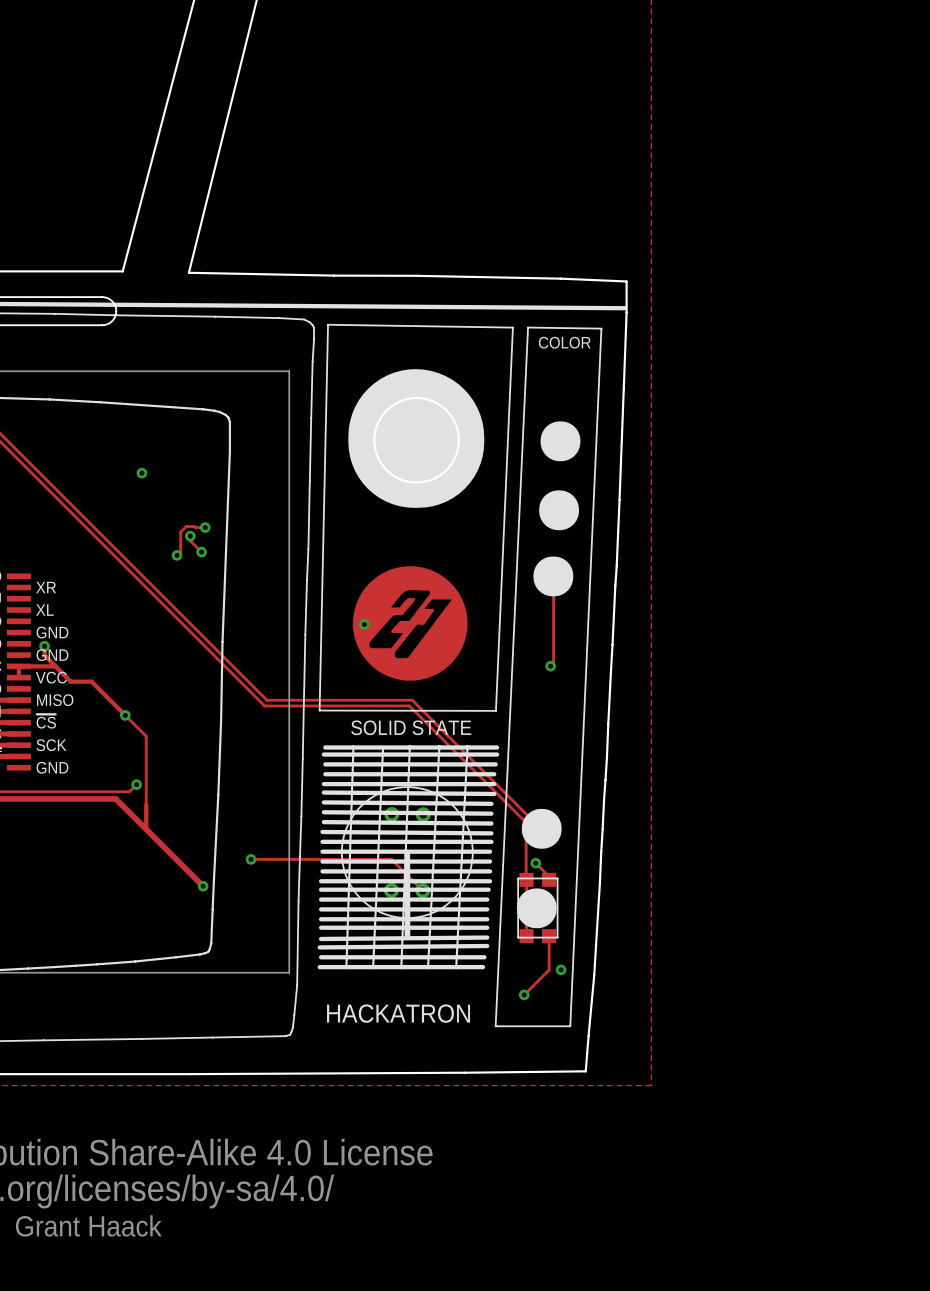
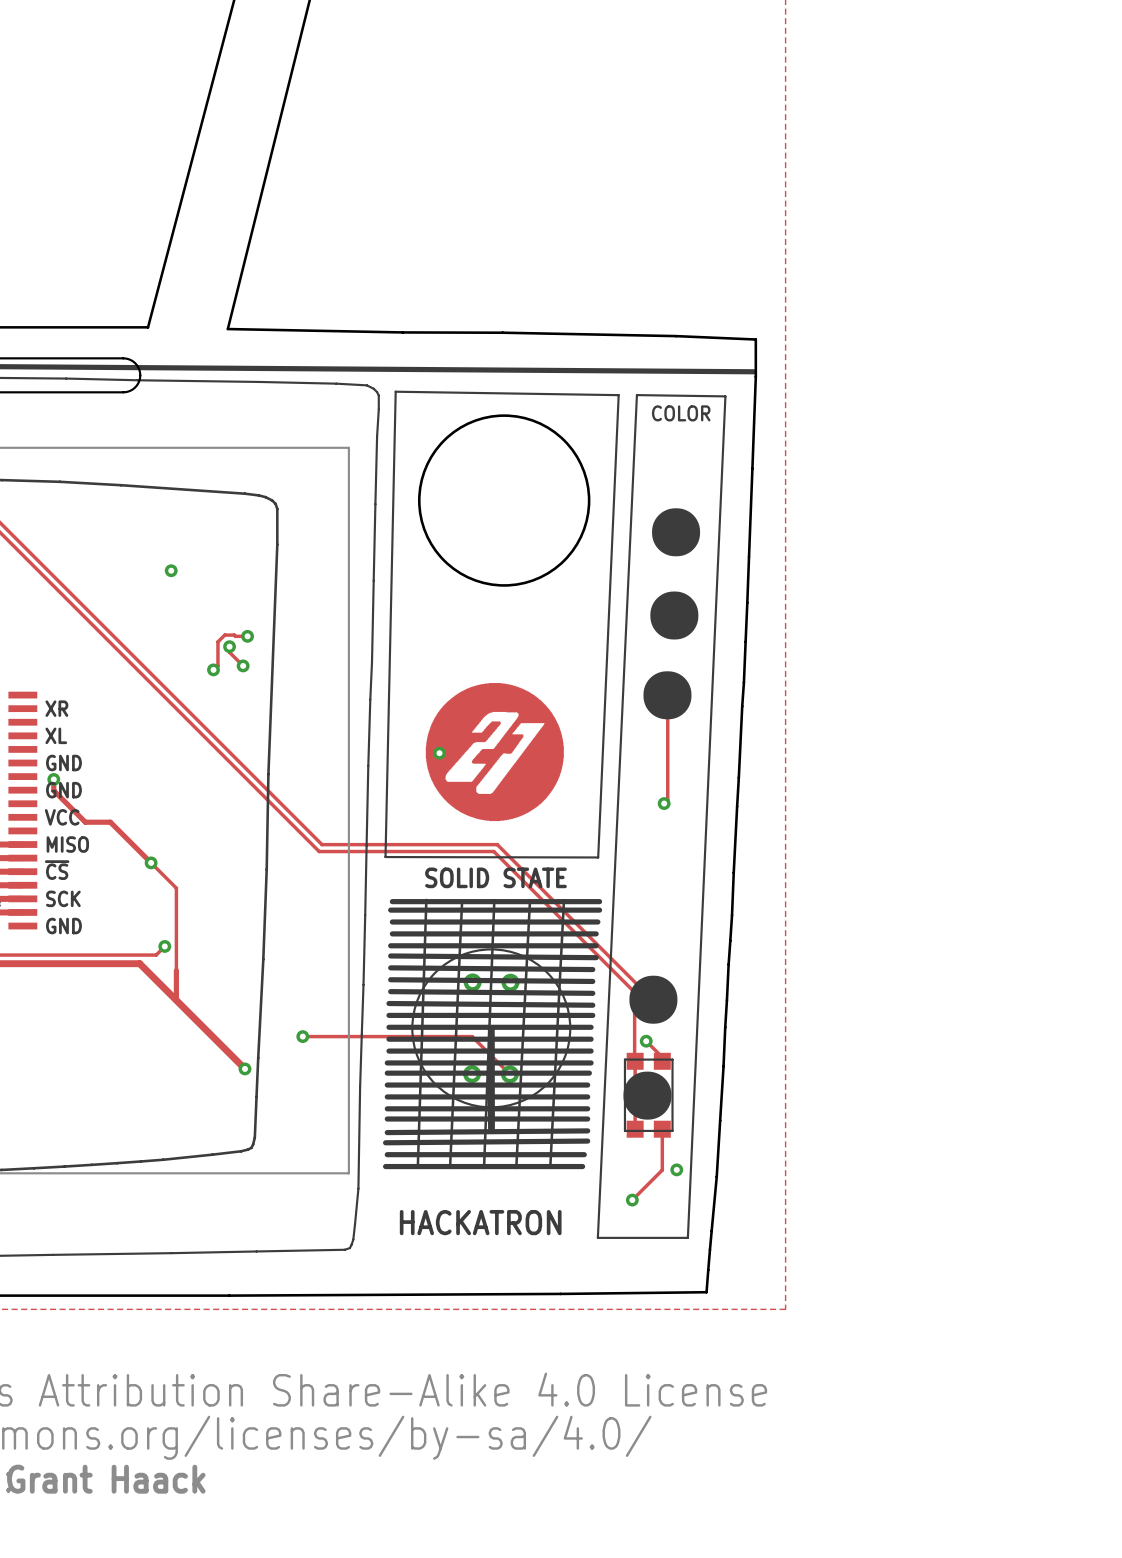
round board edge: none -> [417, 414, 591, 587]
drawing: [348, 369, 485, 508] -> none
track: (55, 666) (18, 666) (18, 677) -> none

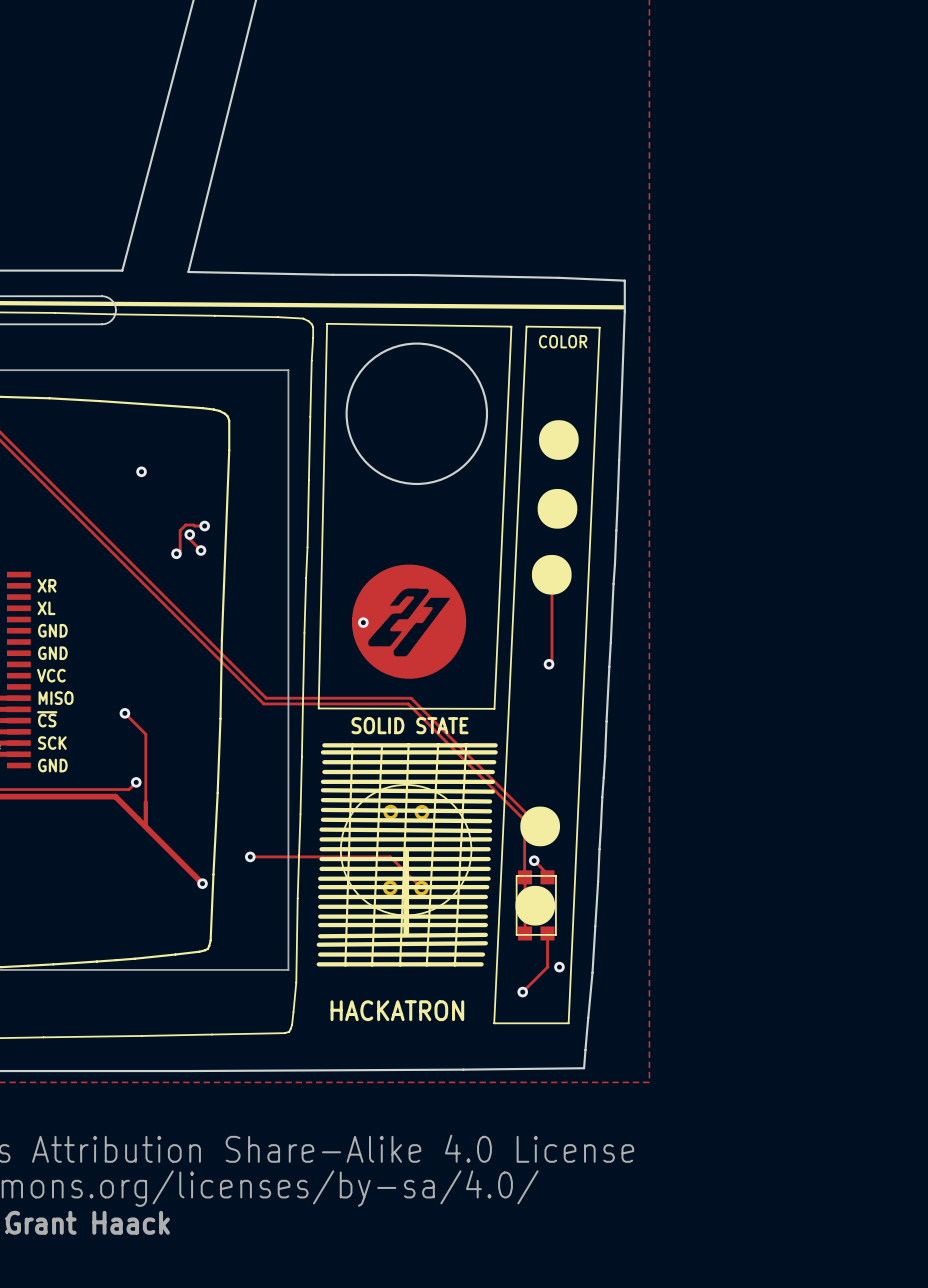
track: (53, 779) (53, 790) (85, 822) (110, 822) (151, 862) -> none
via: (53, 779) -> none

